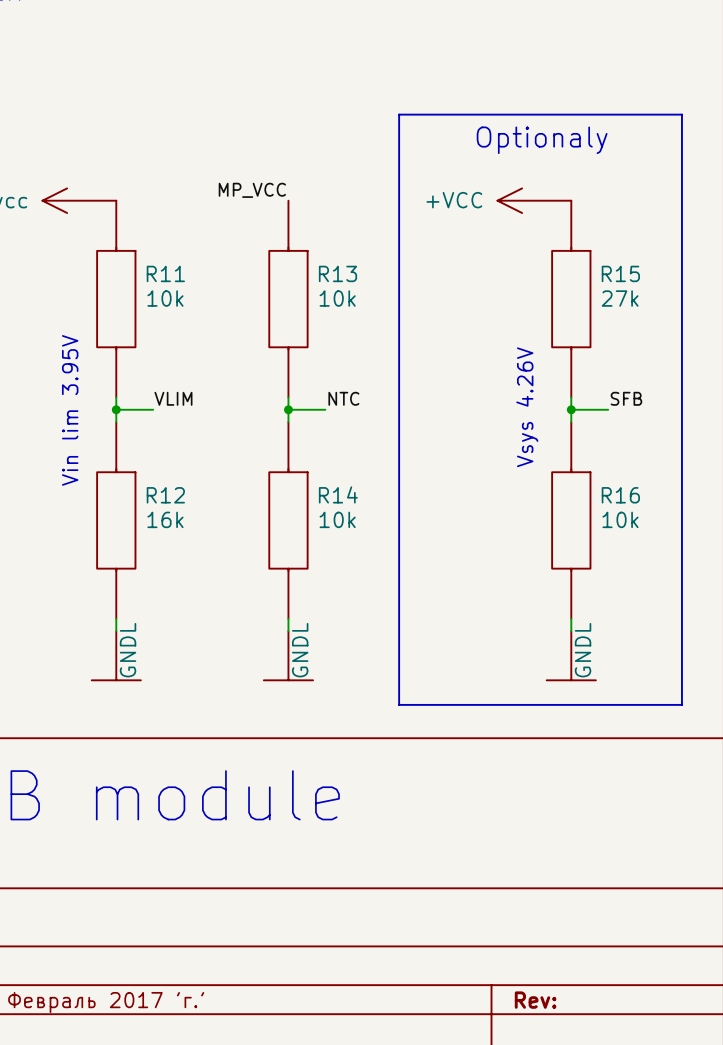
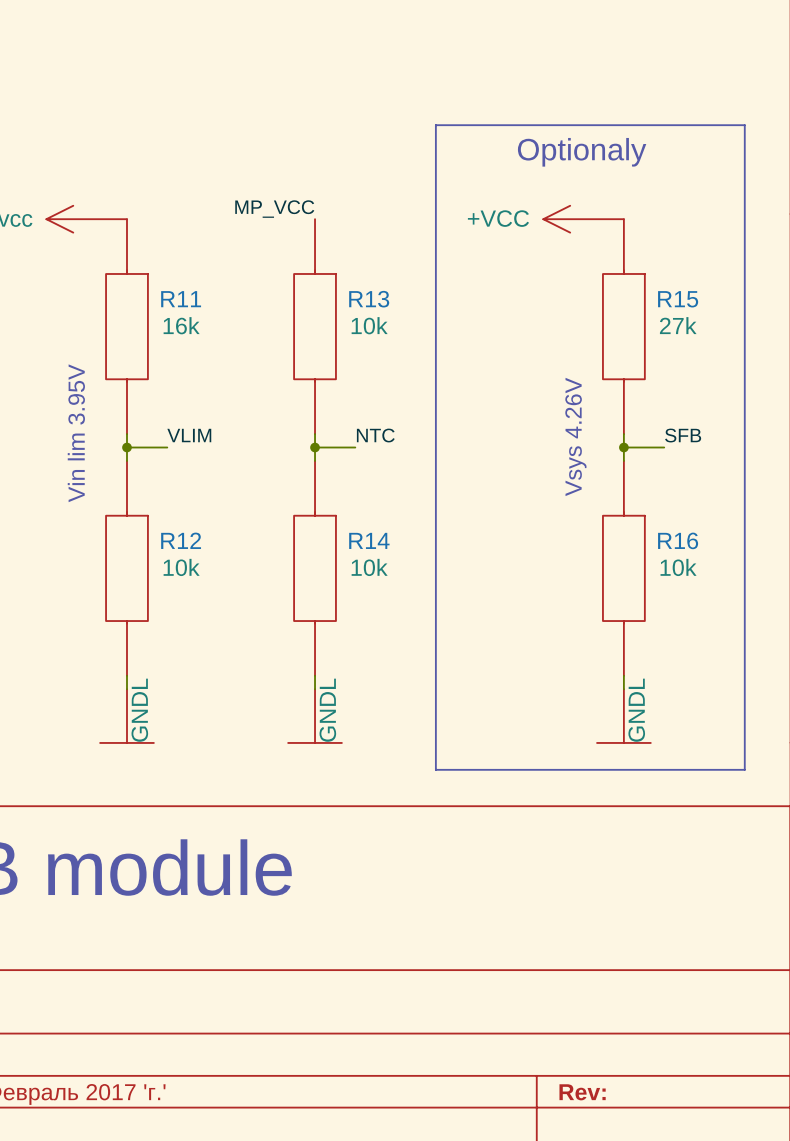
R11 value: 10k (165, 298) -> 16k (181, 325)
R12 value: 16k (165, 519) -> 10k (181, 567)

